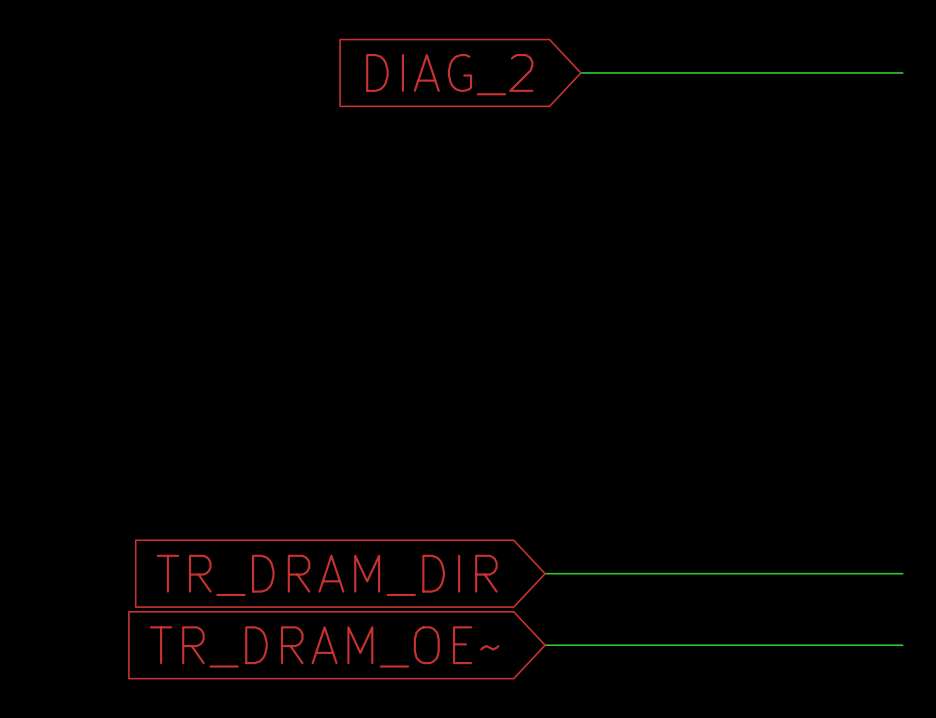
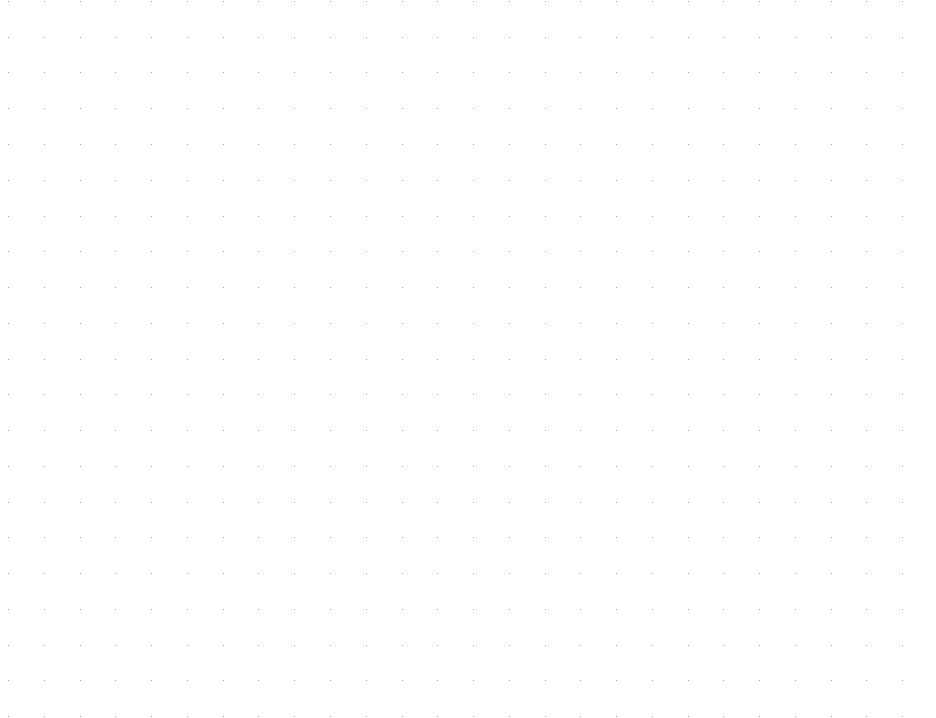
wire: (580, 72) (902, 72) -> none
global label: DIAG_2 (449, 74) -> none
wire: (545, 573) (902, 573) -> none
global label: TR_DRAM_DIR (327, 575) -> none
wire: (545, 645) (902, 645) -> none
global label: TR_DRAM_OE~ (324, 646) -> none

